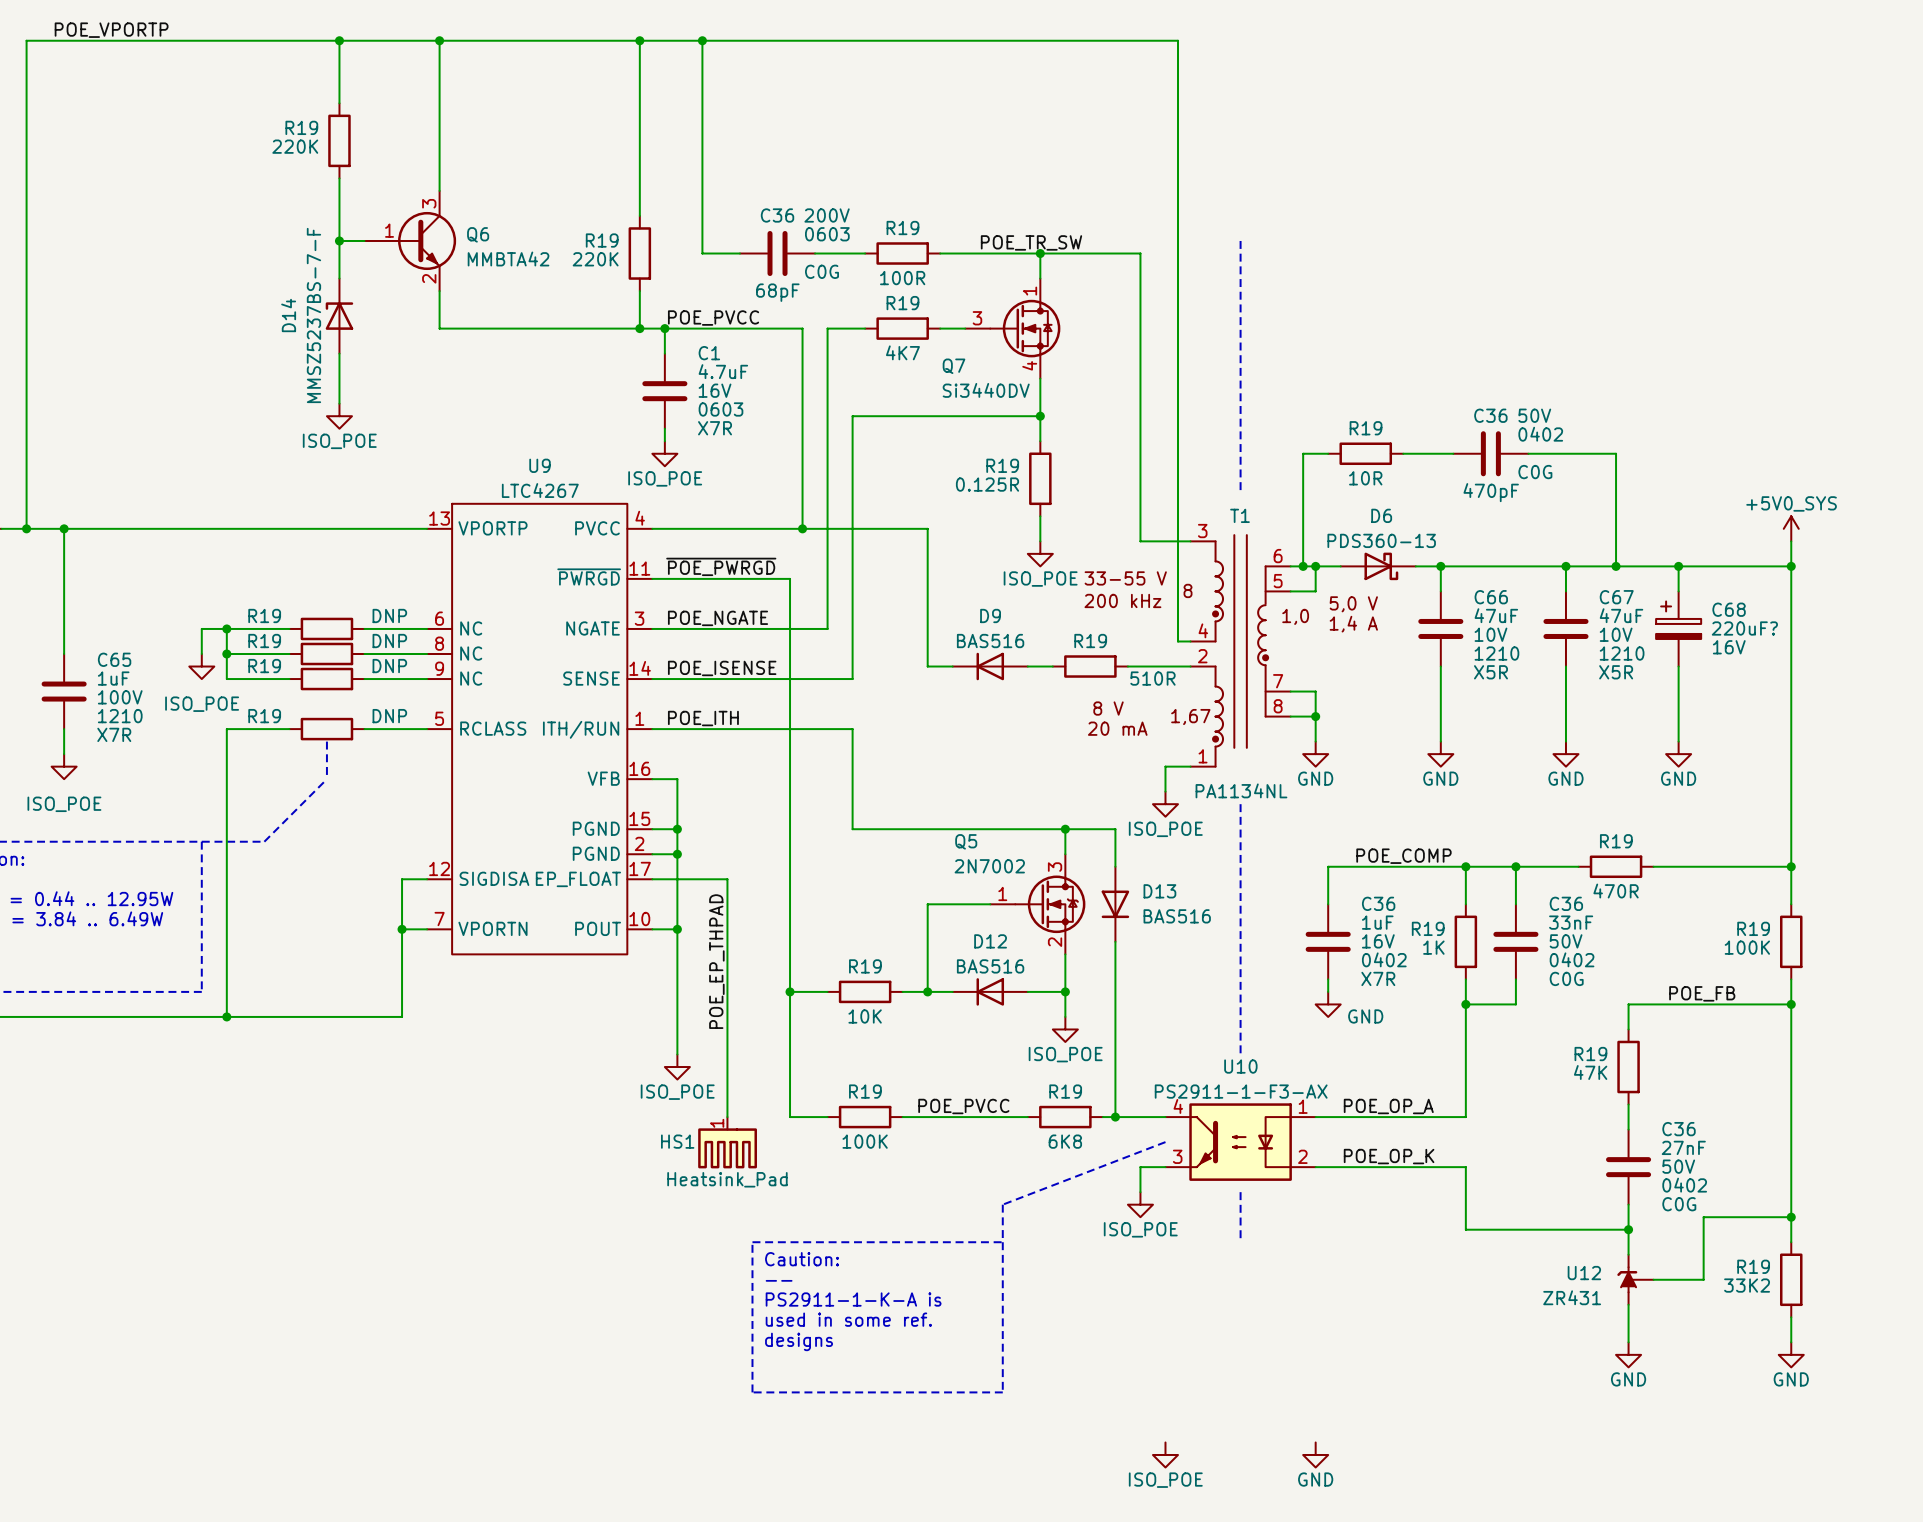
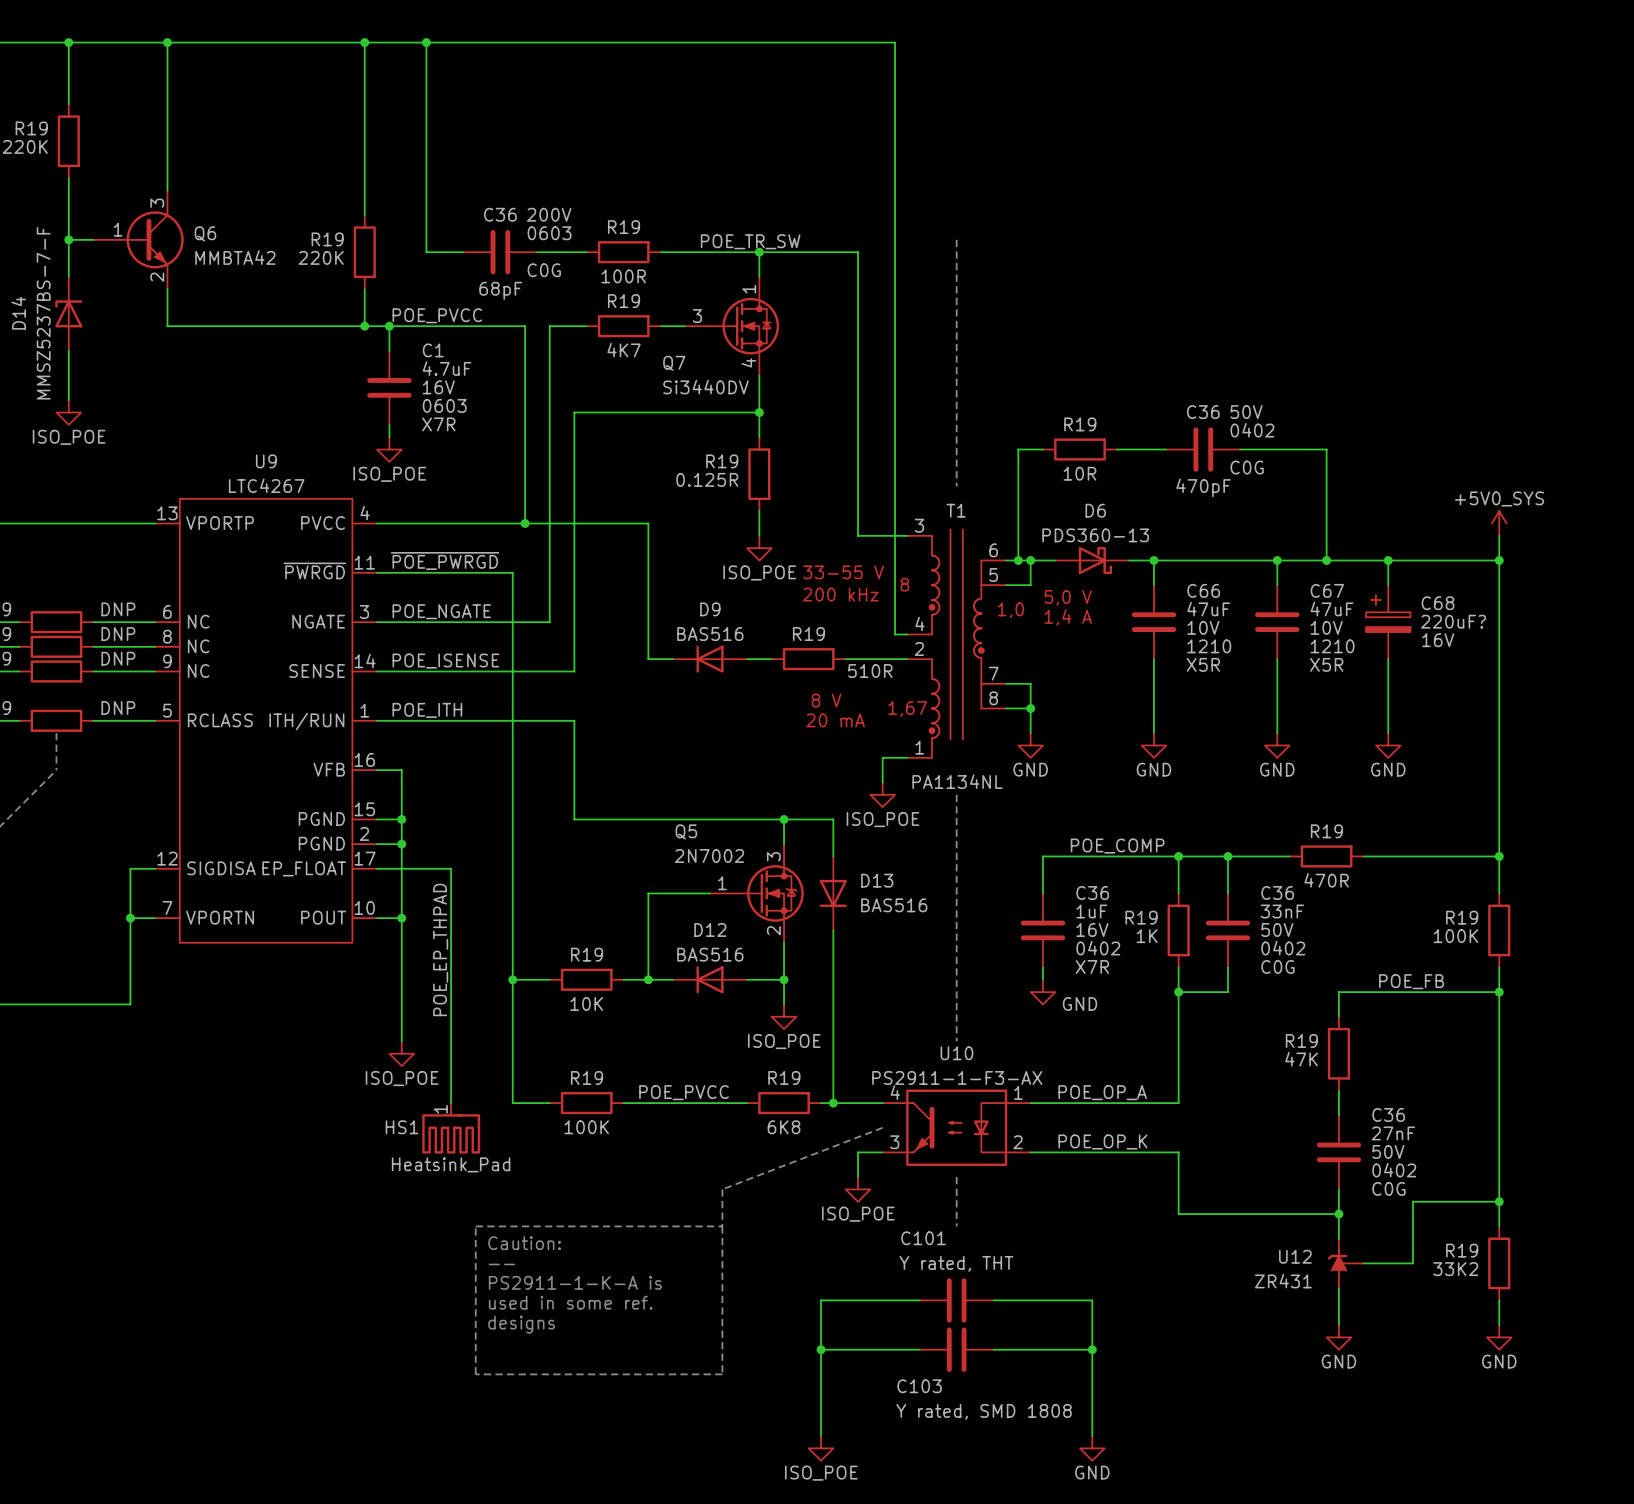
wire: none -> (919, 1300) (821, 1300) (821, 1436)
C101: none -> Y rated, THT (956, 1300)
wire: none -> (993, 1300) (1092, 1300) (1092, 1436)
wire: none -> (821, 1349) (919, 1349)
junction: none -> (821, 1349)
C103: none -> Y rated, SMD 1808 (956, 1349)
wire: none -> (993, 1349) (1092, 1349)
junction: none -> (1092, 1349)
power symbol position: ISO_POE (1165, 1454) -> ISO_POE (821, 1448)
power symbol position: GND (1315, 1454) -> GND (1092, 1448)

